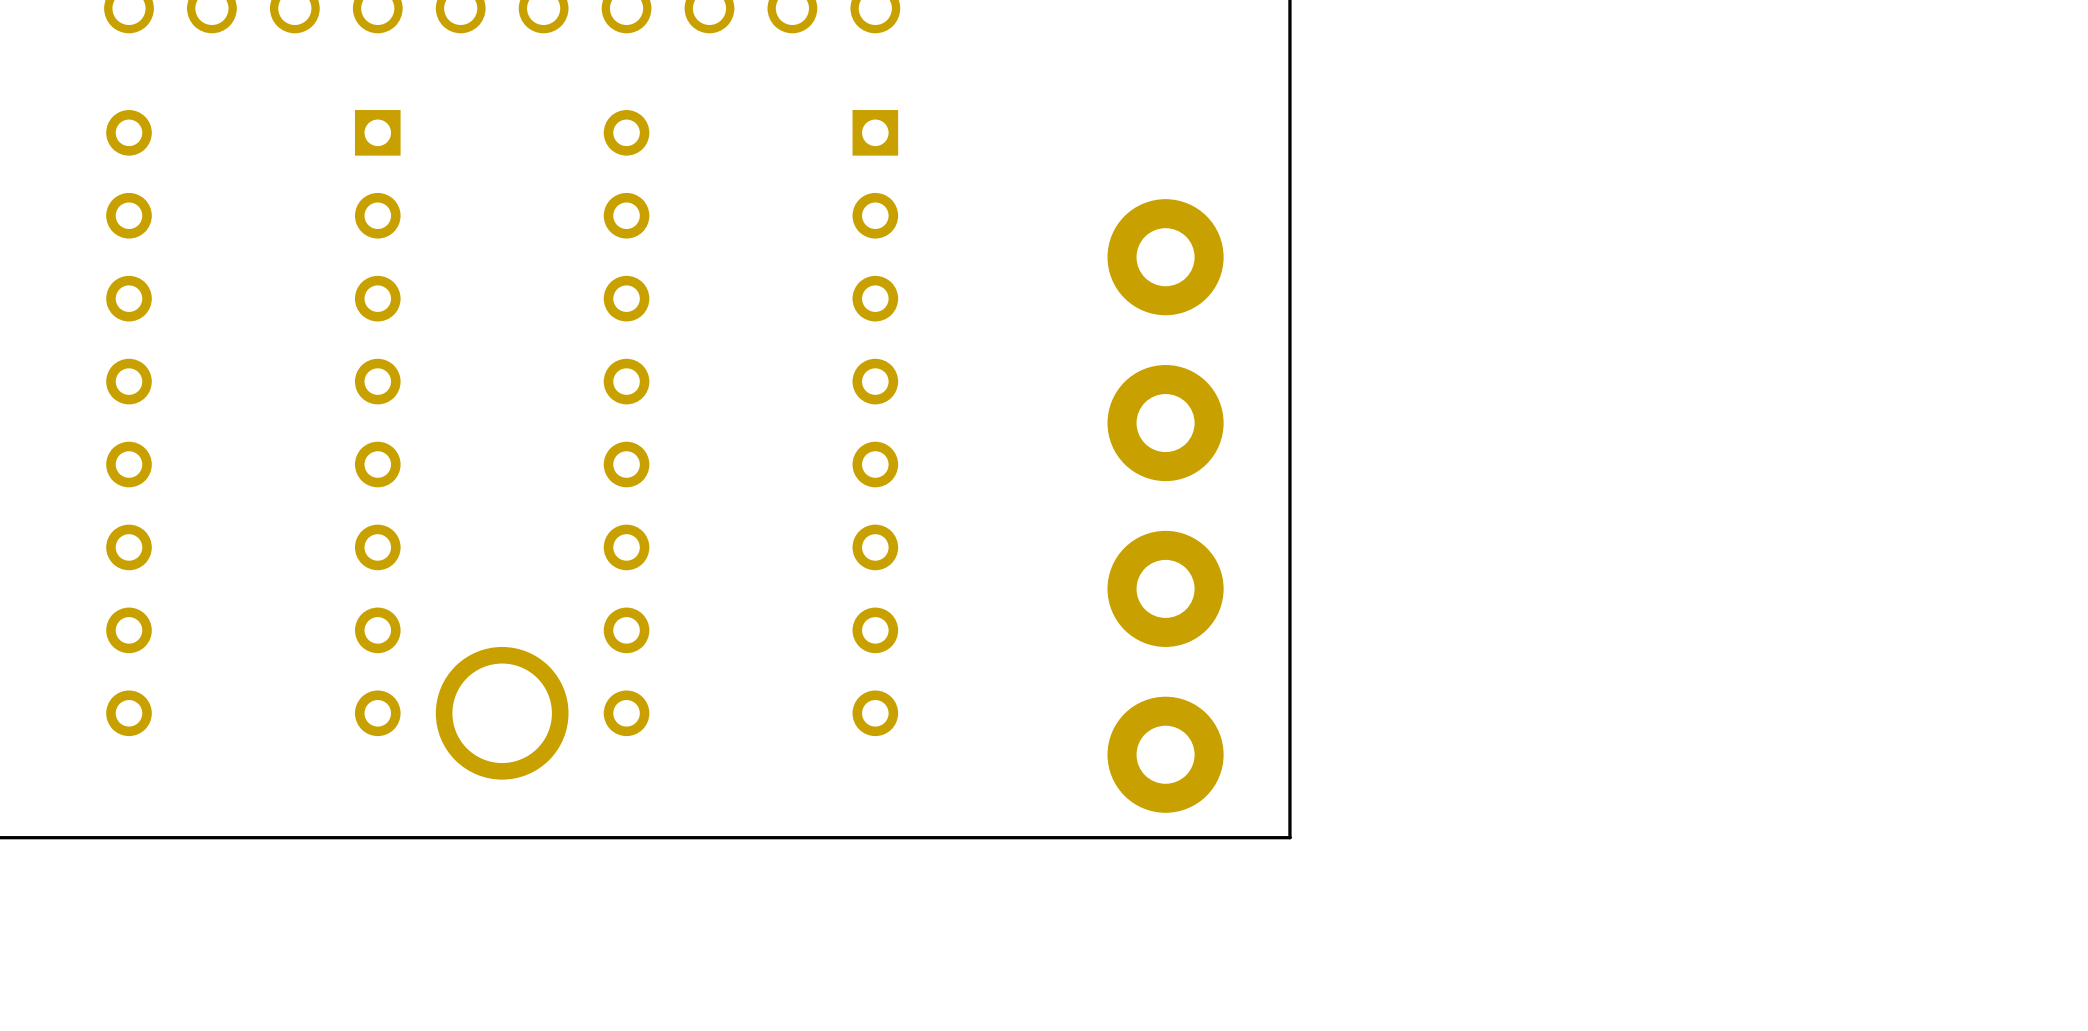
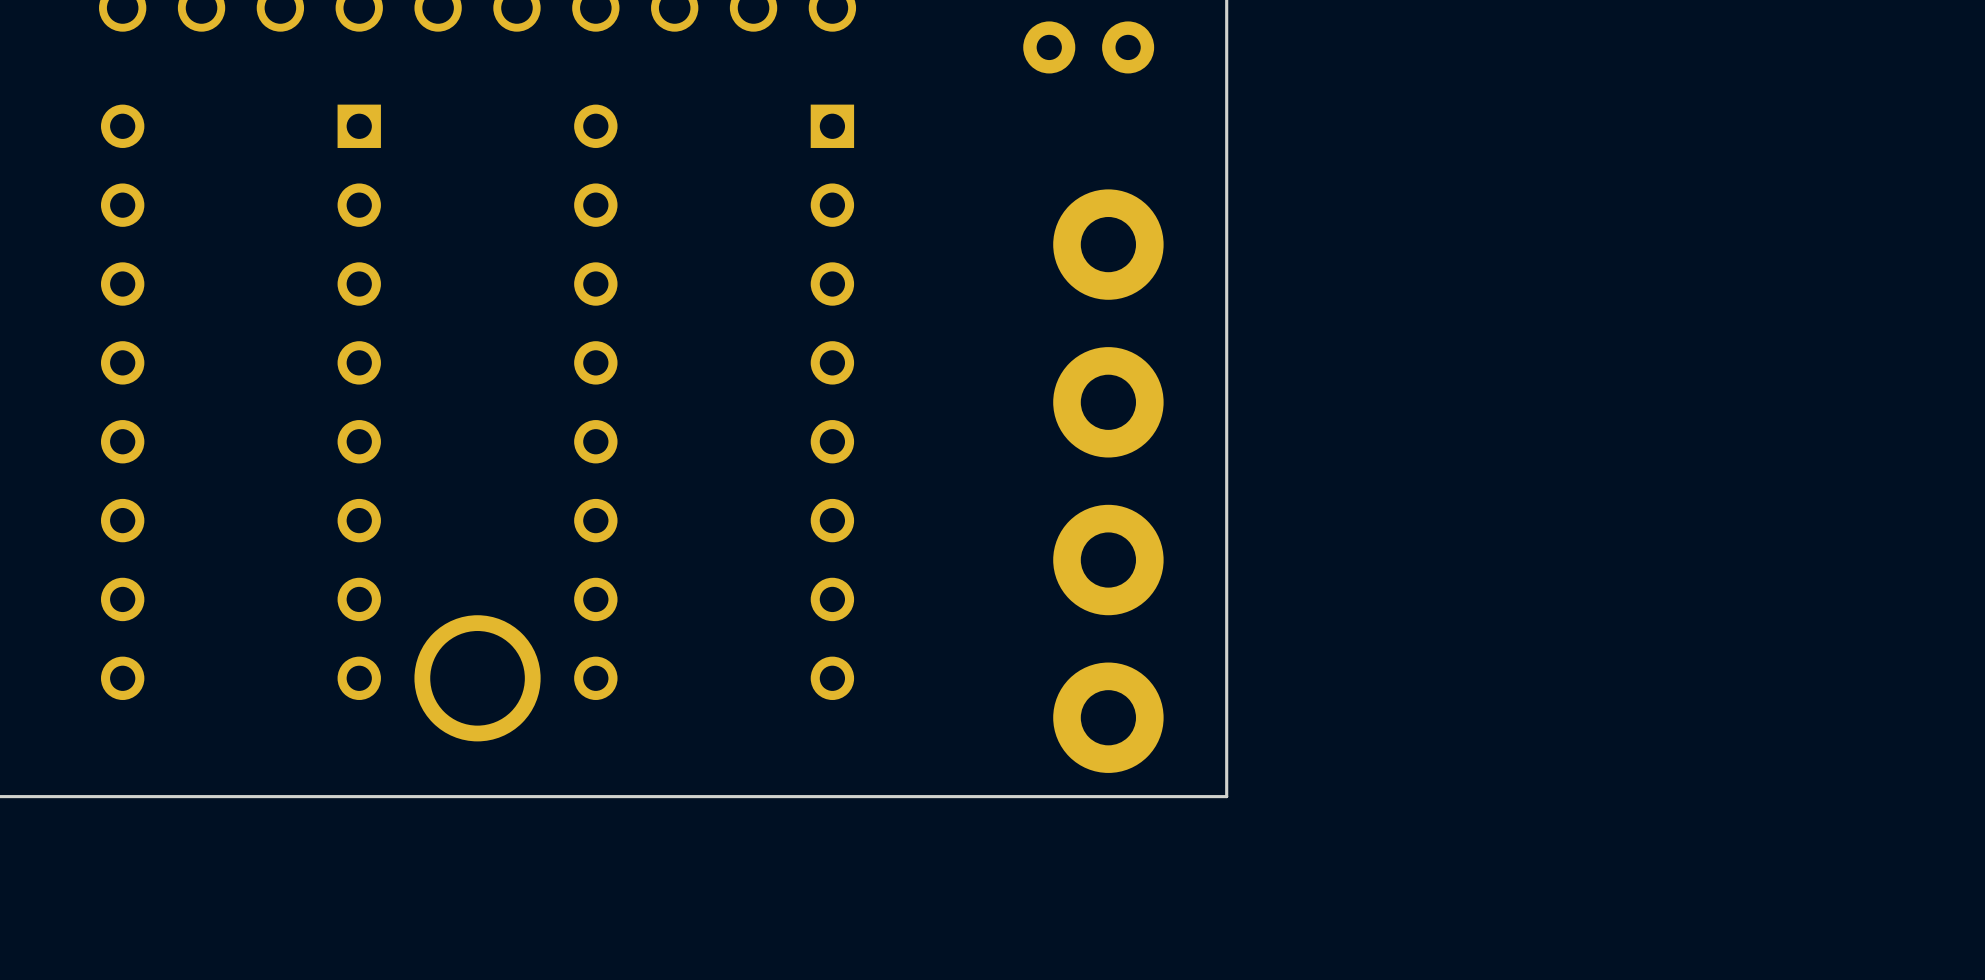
part: none -> (1088, 47)

